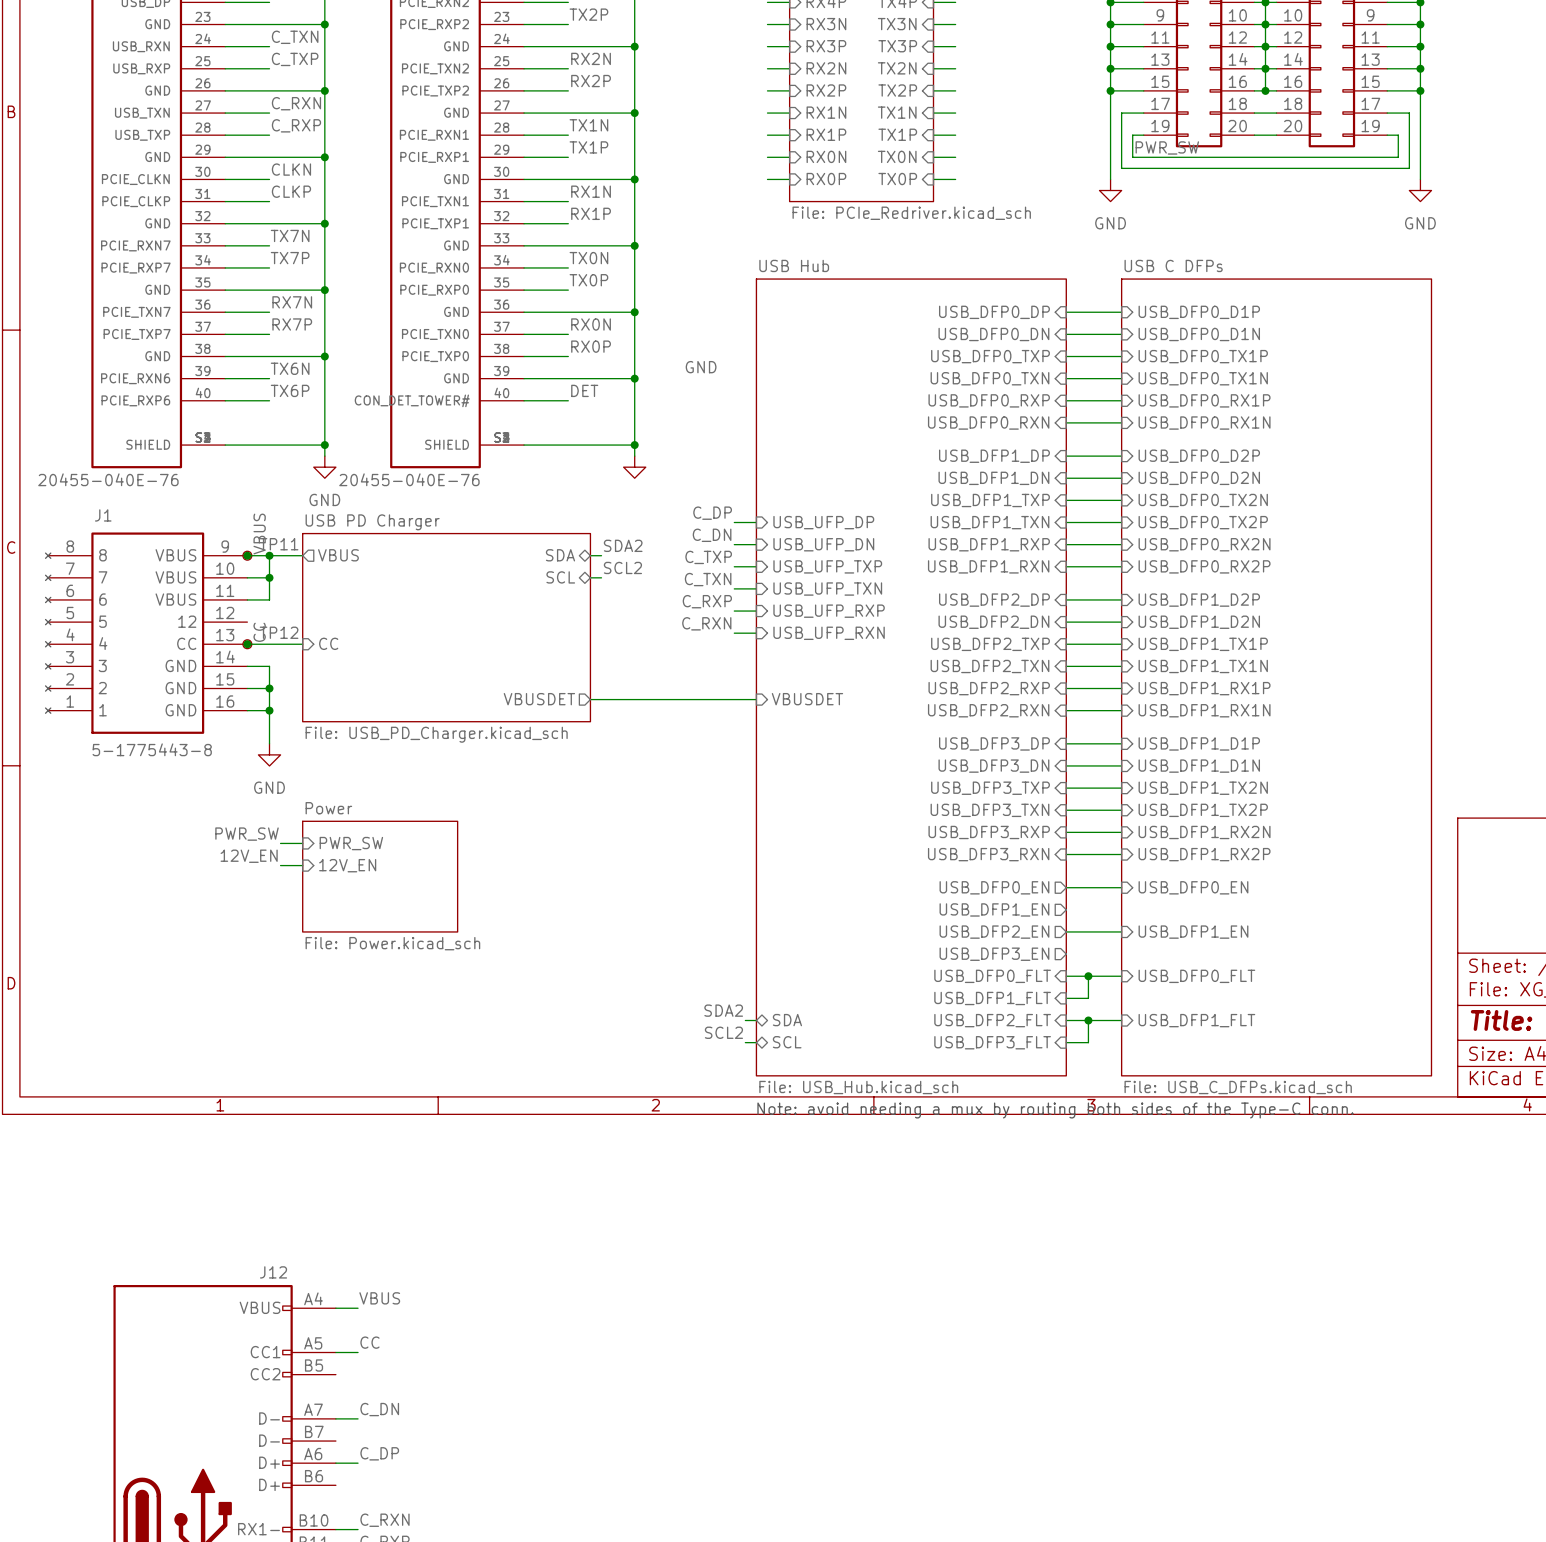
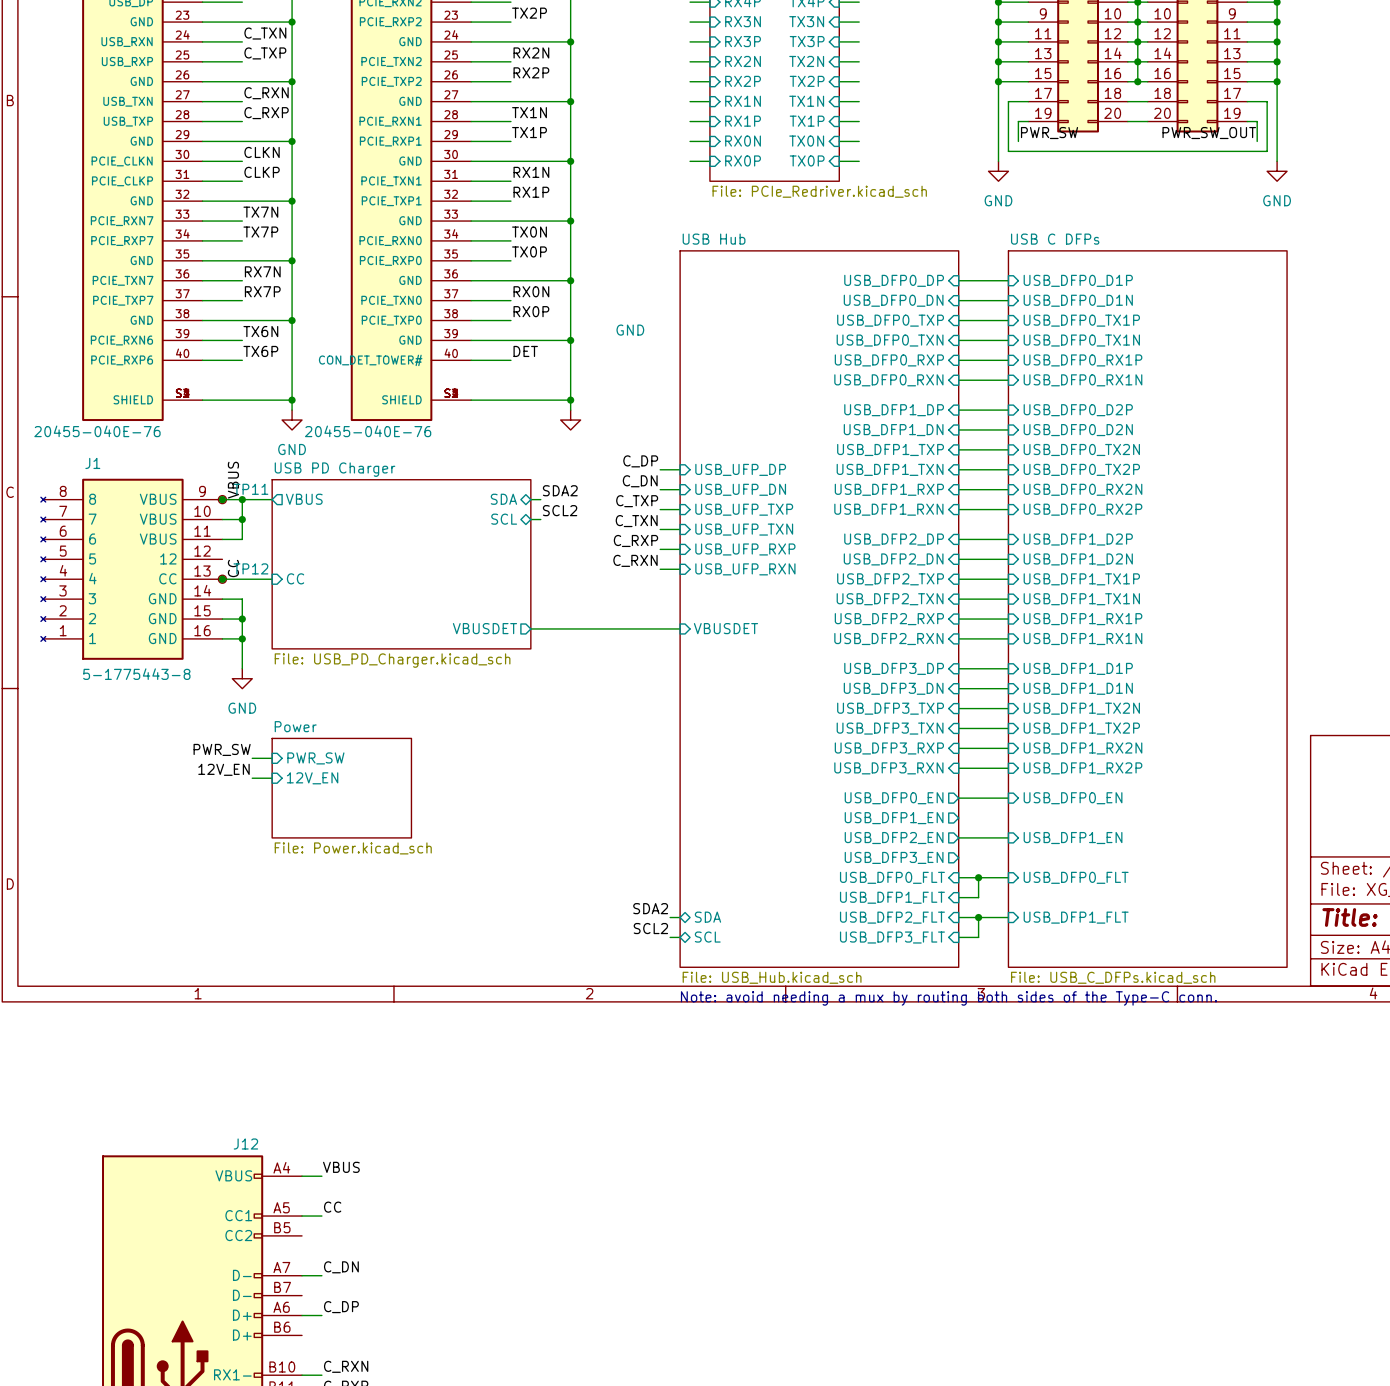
label: none -> PWR_SW_OUT (1209, 133)
wire: (1132, 157) (1398, 157) -> none

